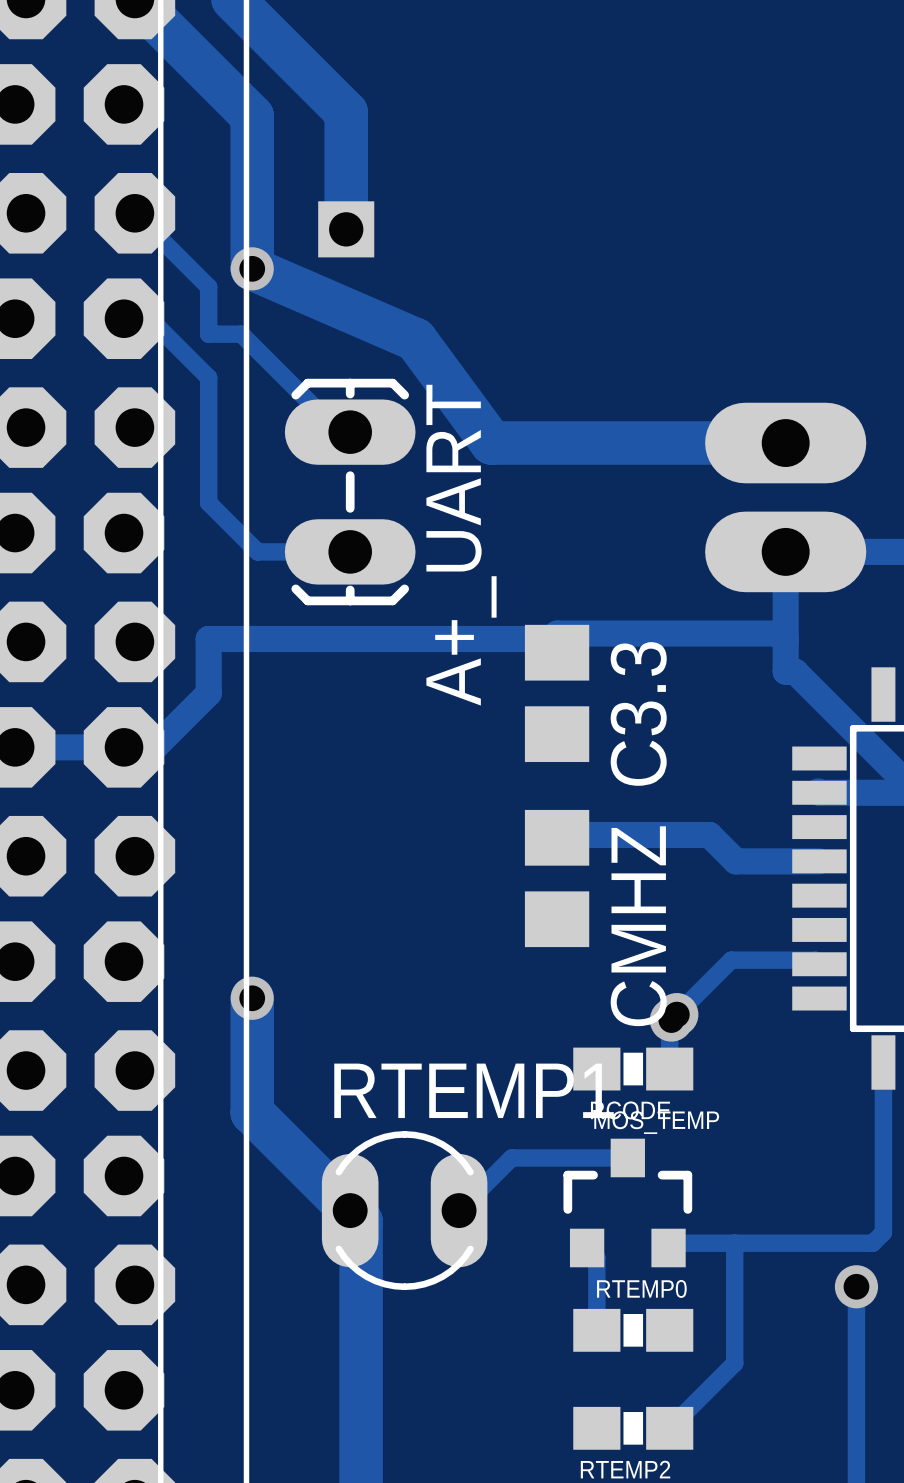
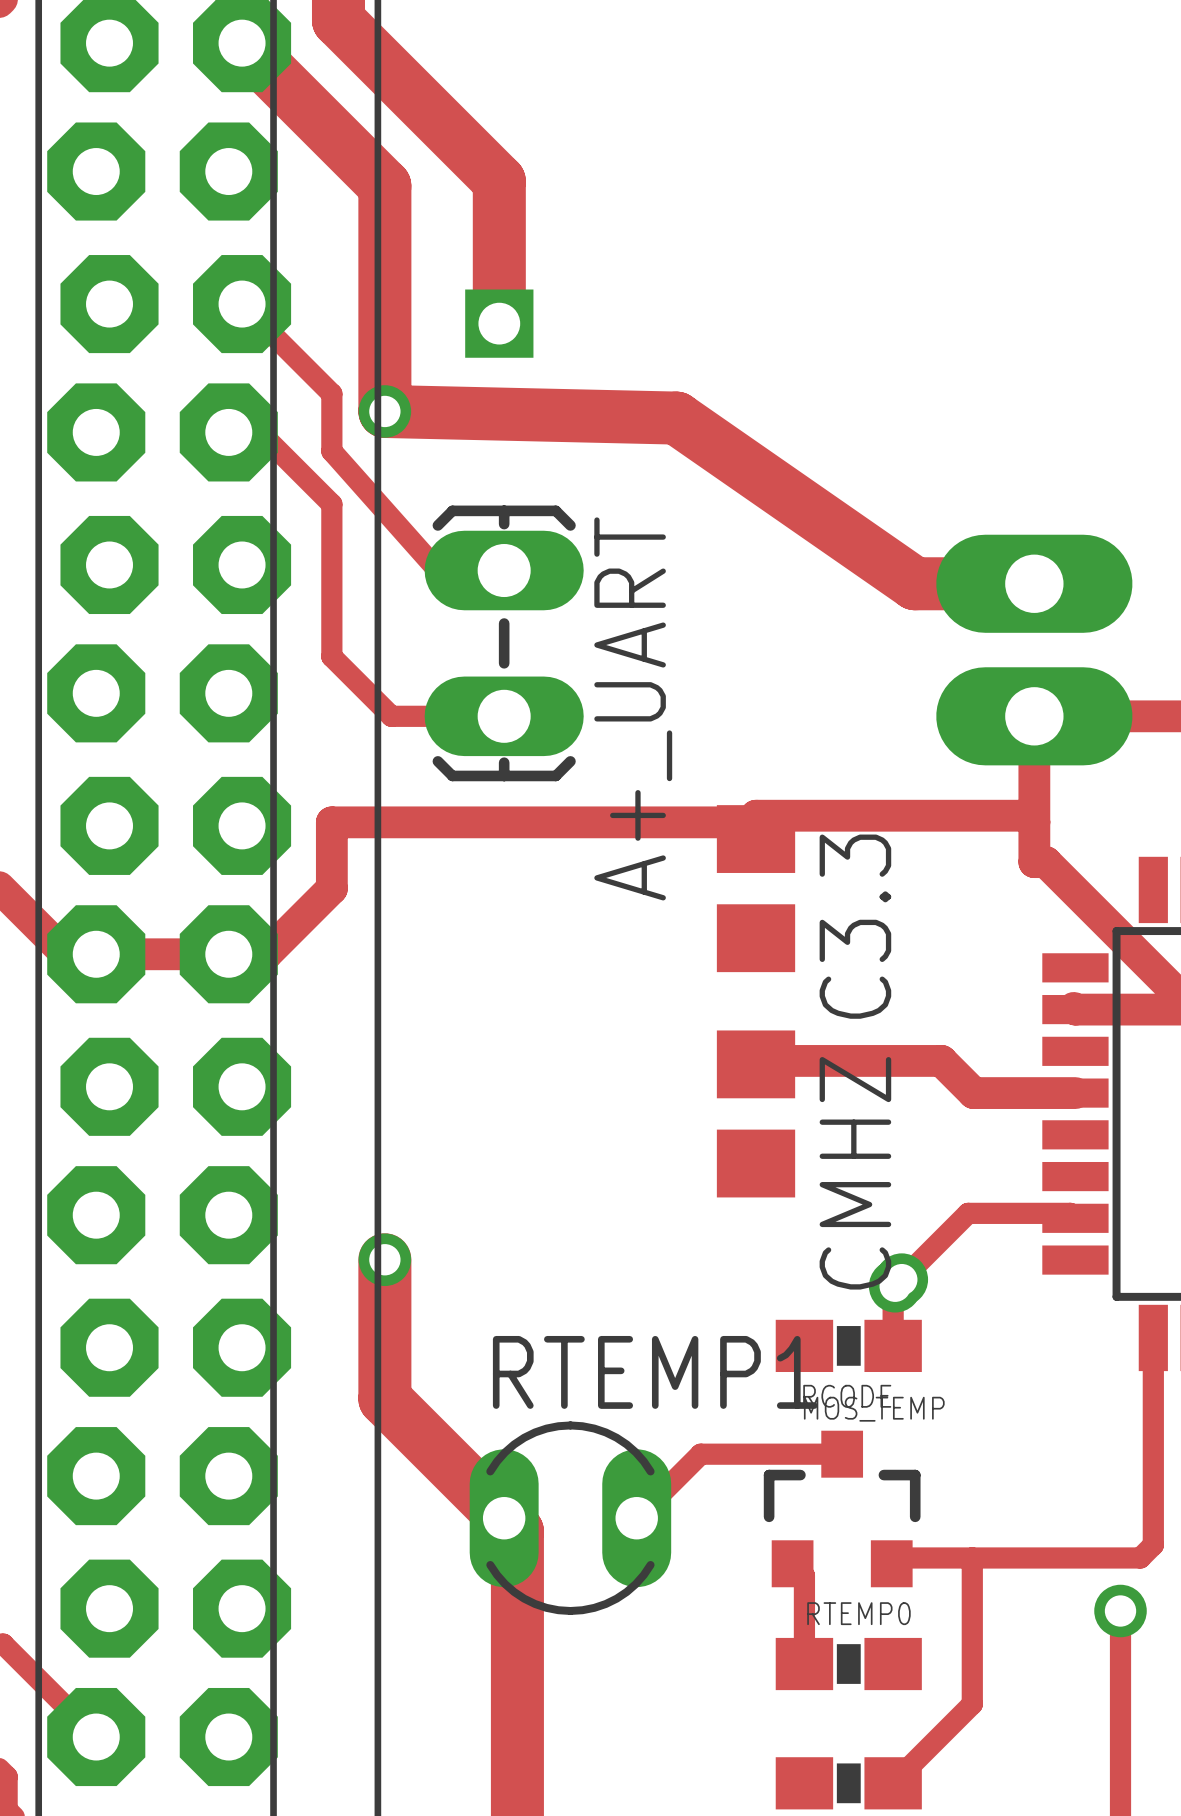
track: (252, 268) (415, 339) (491, 443) (687, 443) -> (384, 371) (384, 411) (676, 418) (915, 583)
via position: (252, 268) -> (384, 411)
track: (208, 334) (241, 334) (339, 432) -> (331, 451) (437, 570) (490, 570)

